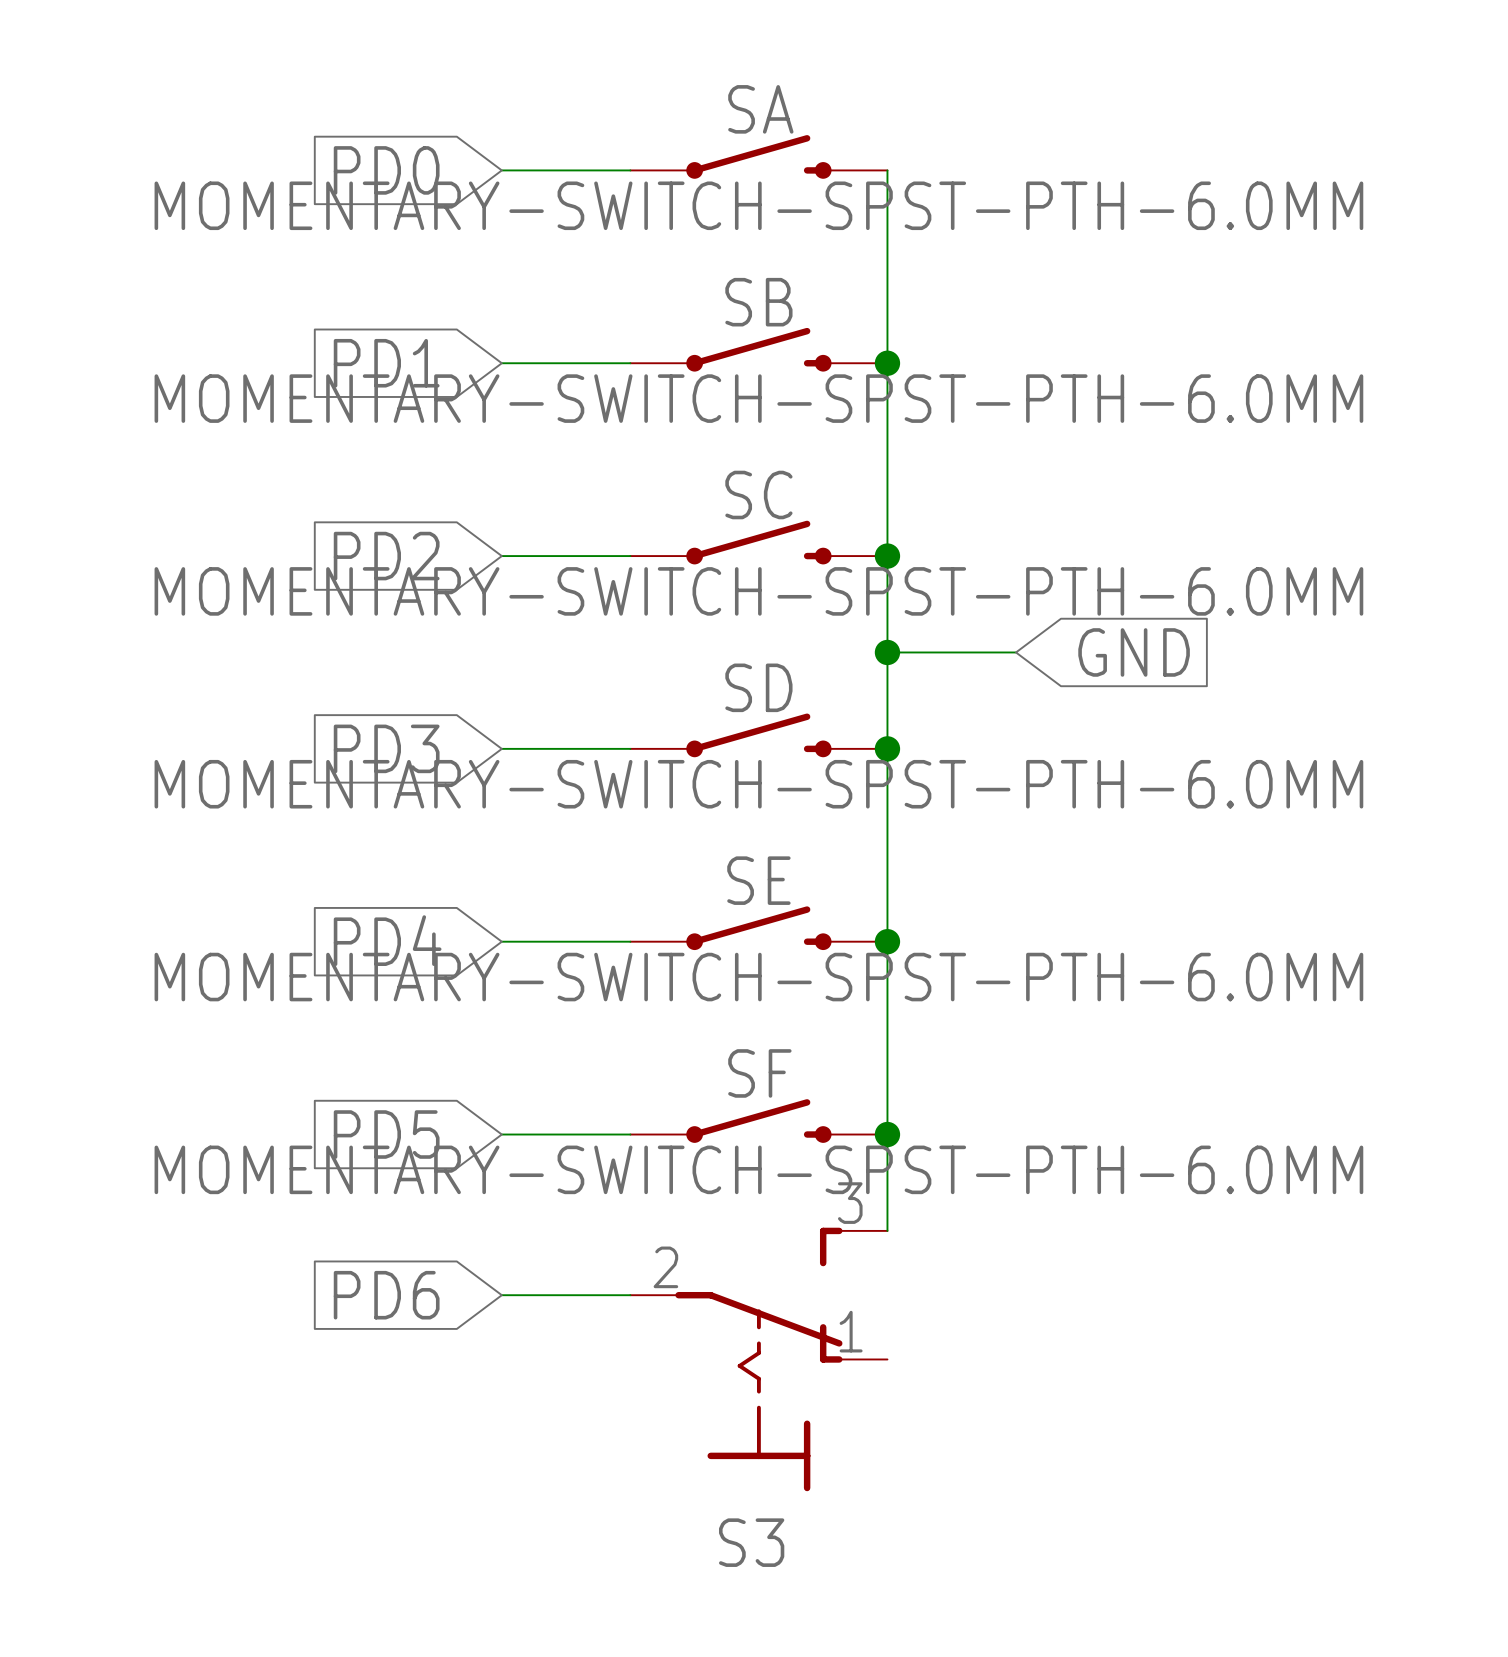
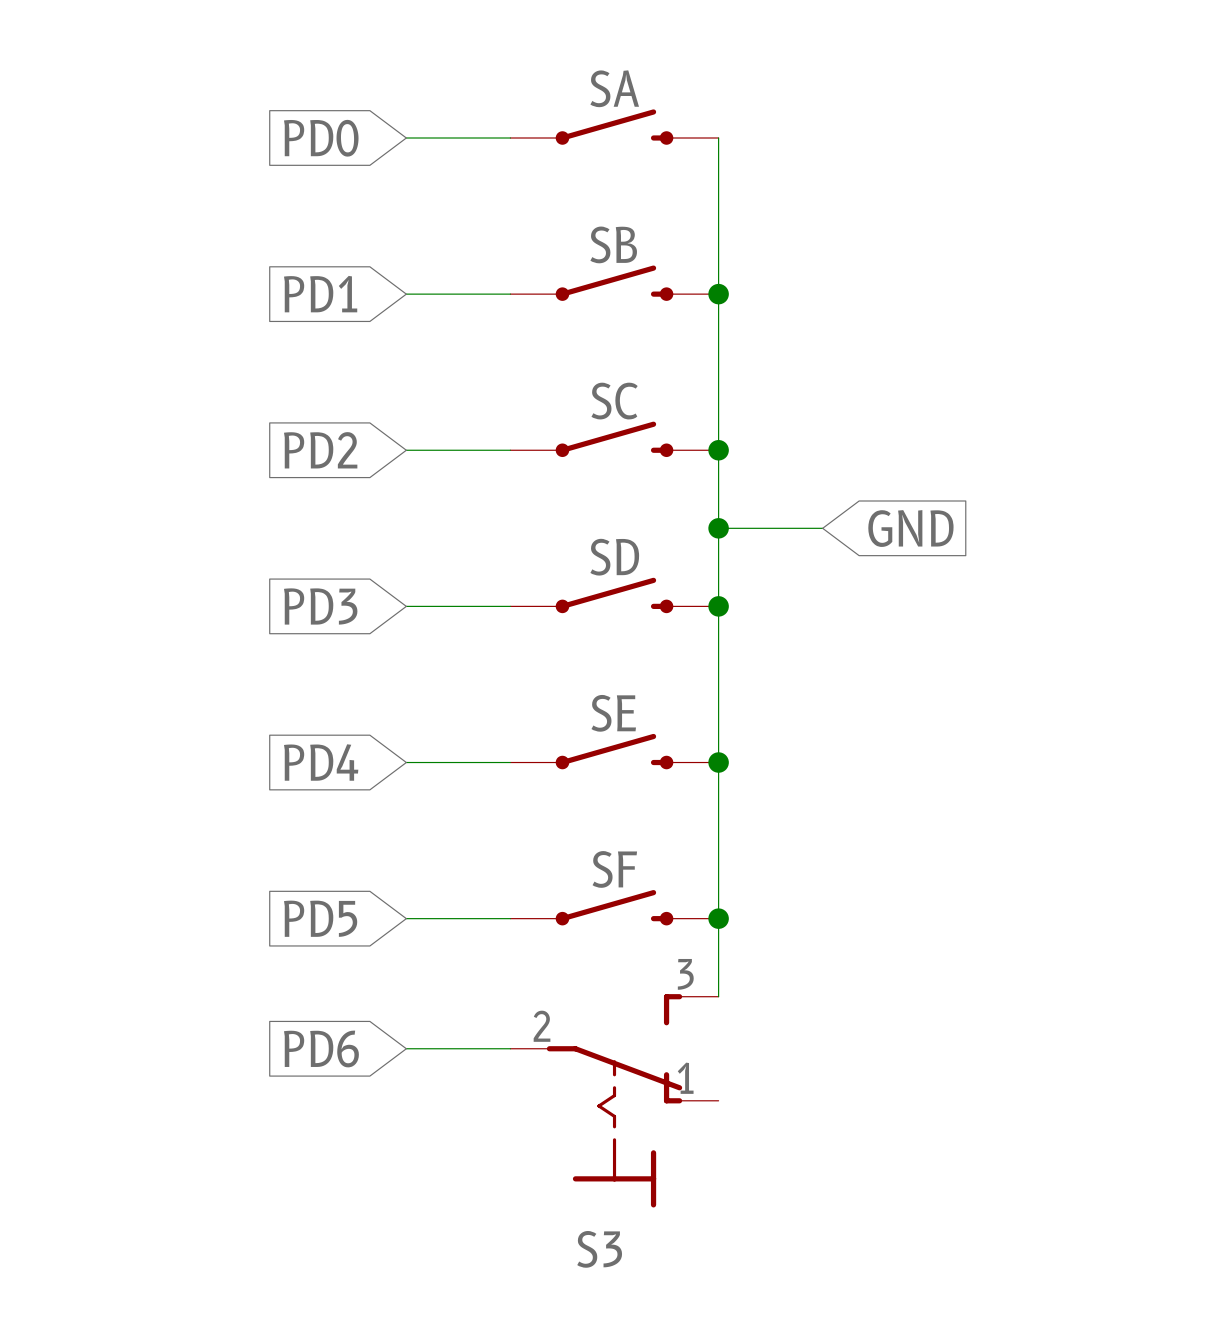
SA value: MOMENTARY-SWITCH-SPST-PTH-6.0MM (758, 205) -> none
SB value: MOMENTARY-SWITCH-SPST-PTH-6.0MM (758, 398) -> none
SC value: MOMENTARY-SWITCH-SPST-PTH-6.0MM (758, 591) -> none
SD value: MOMENTARY-SWITCH-SPST-PTH-6.0MM (758, 784) -> none
SE value: MOMENTARY-SWITCH-SPST-PTH-6.0MM (758, 977) -> none
SF value: MOMENTARY-SWITCH-SPST-PTH-6.0MM (758, 1169) -> none

